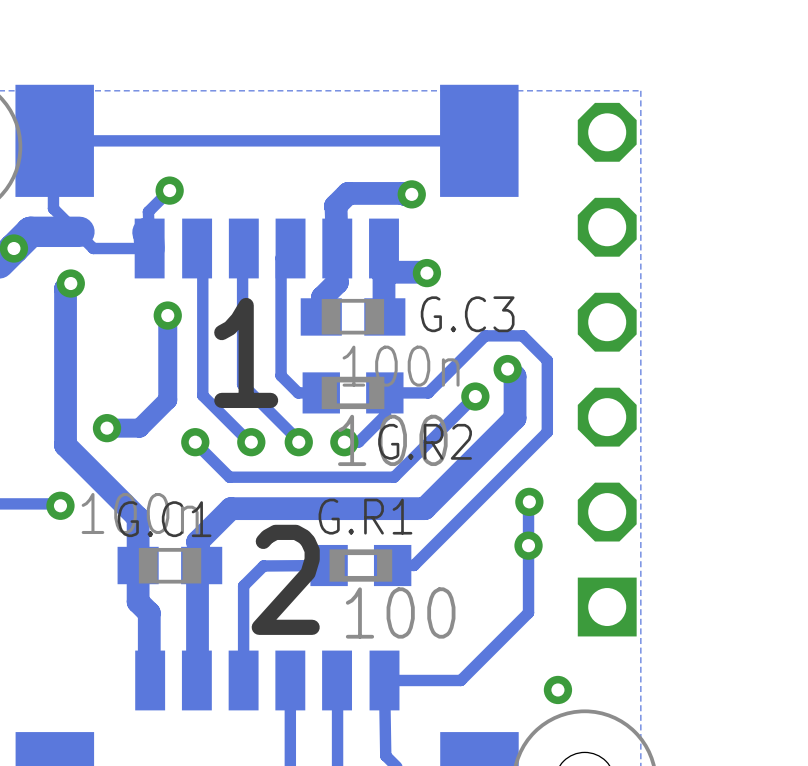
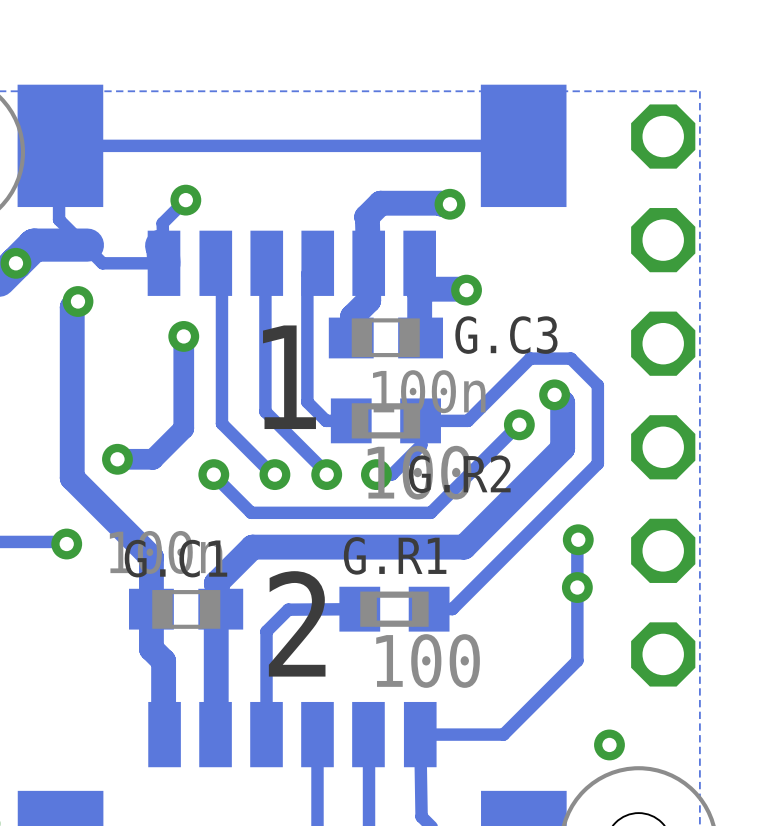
part footprint: [577, 102, 637, 637] -> [631, 104, 696, 687]

